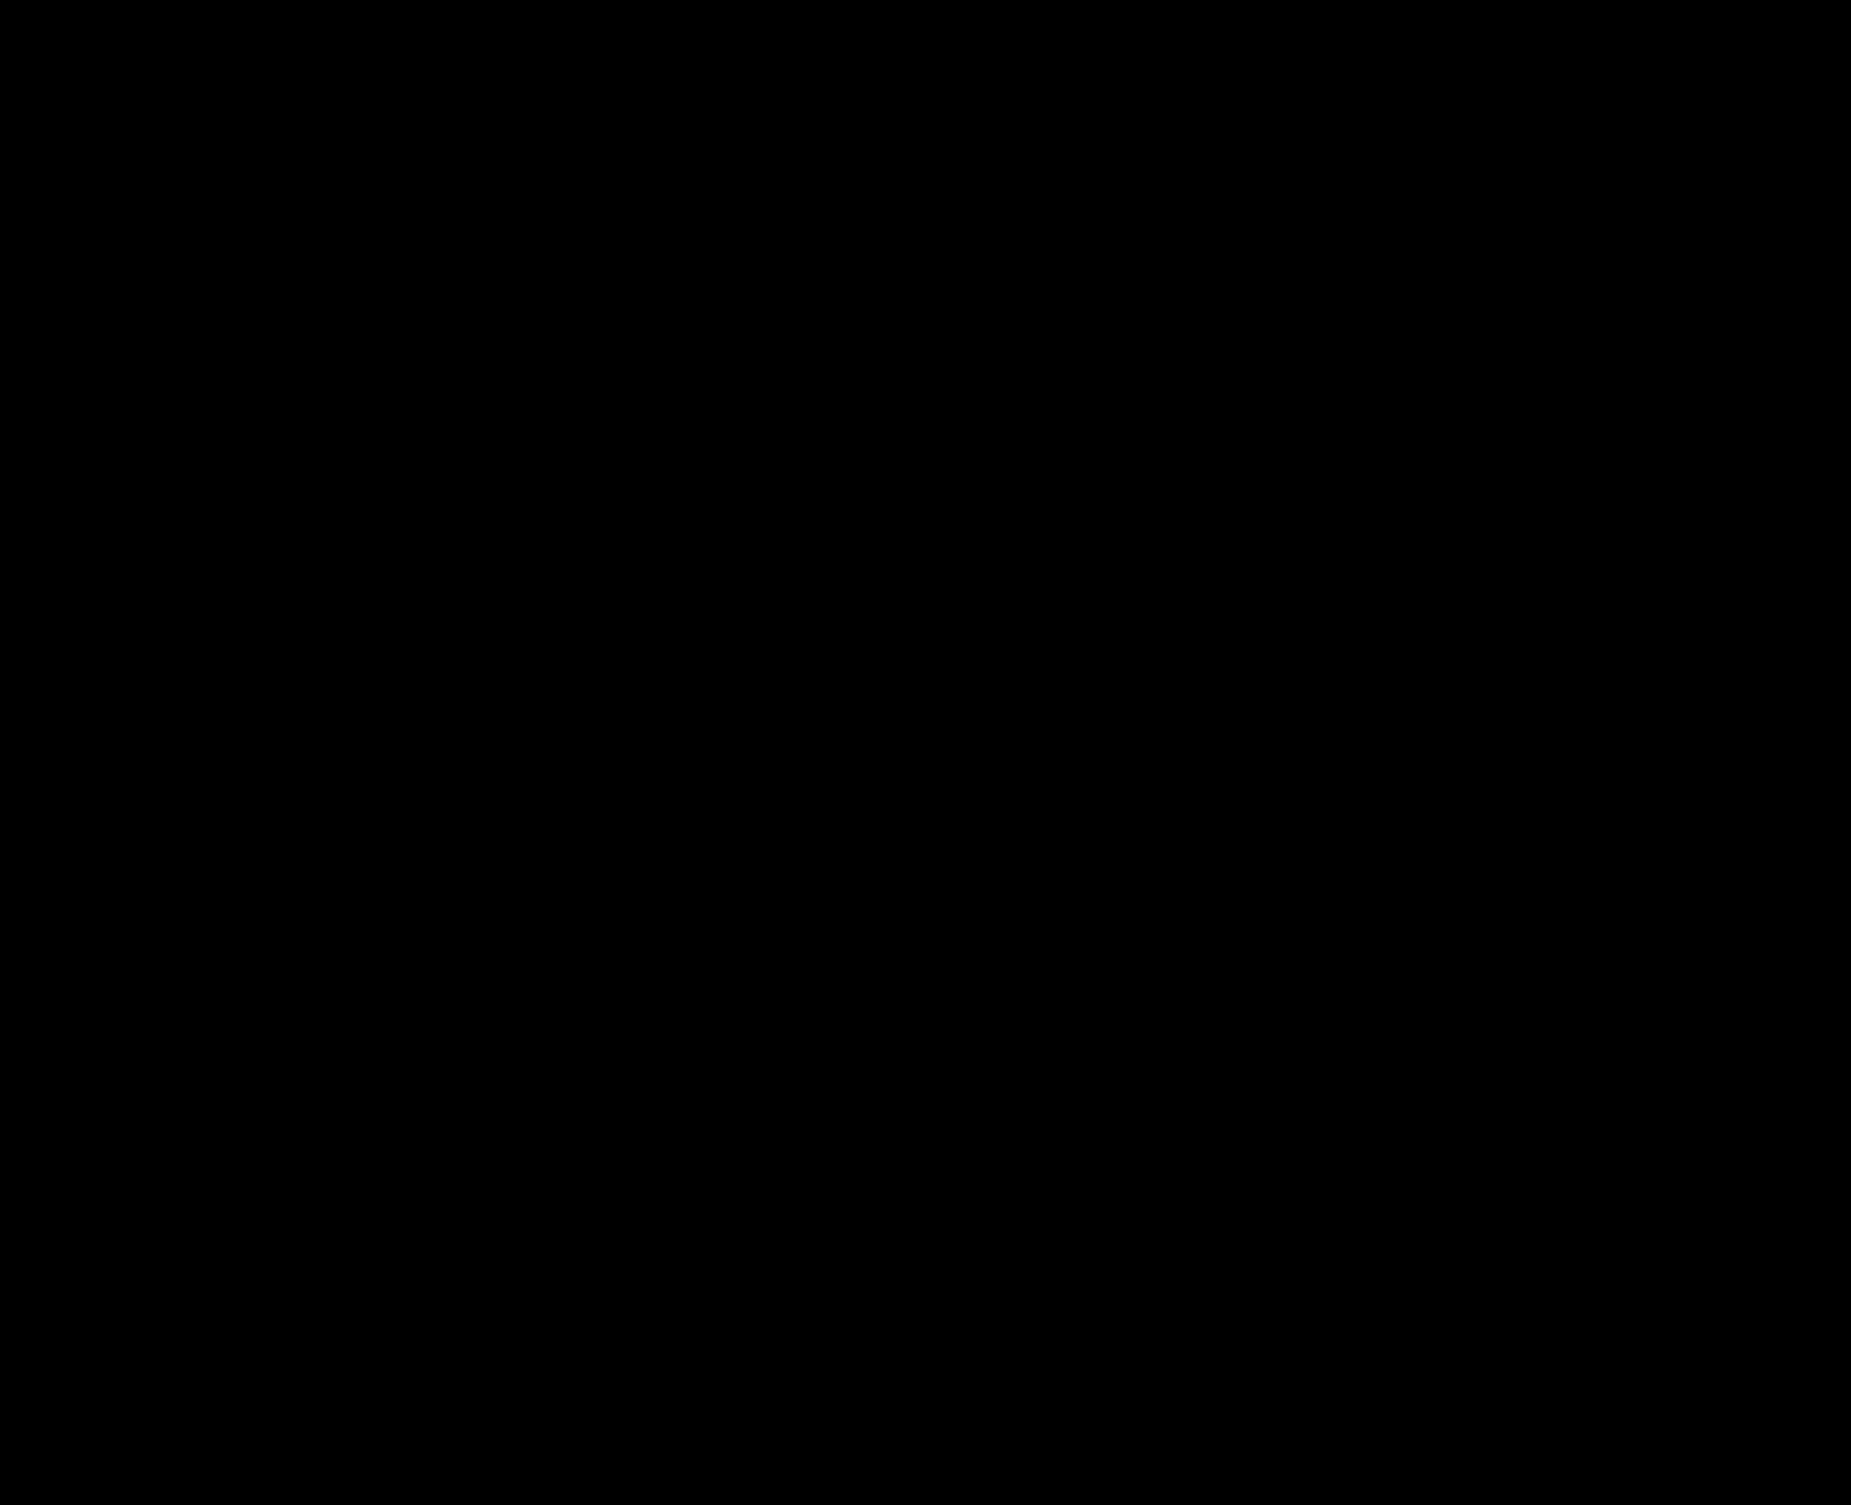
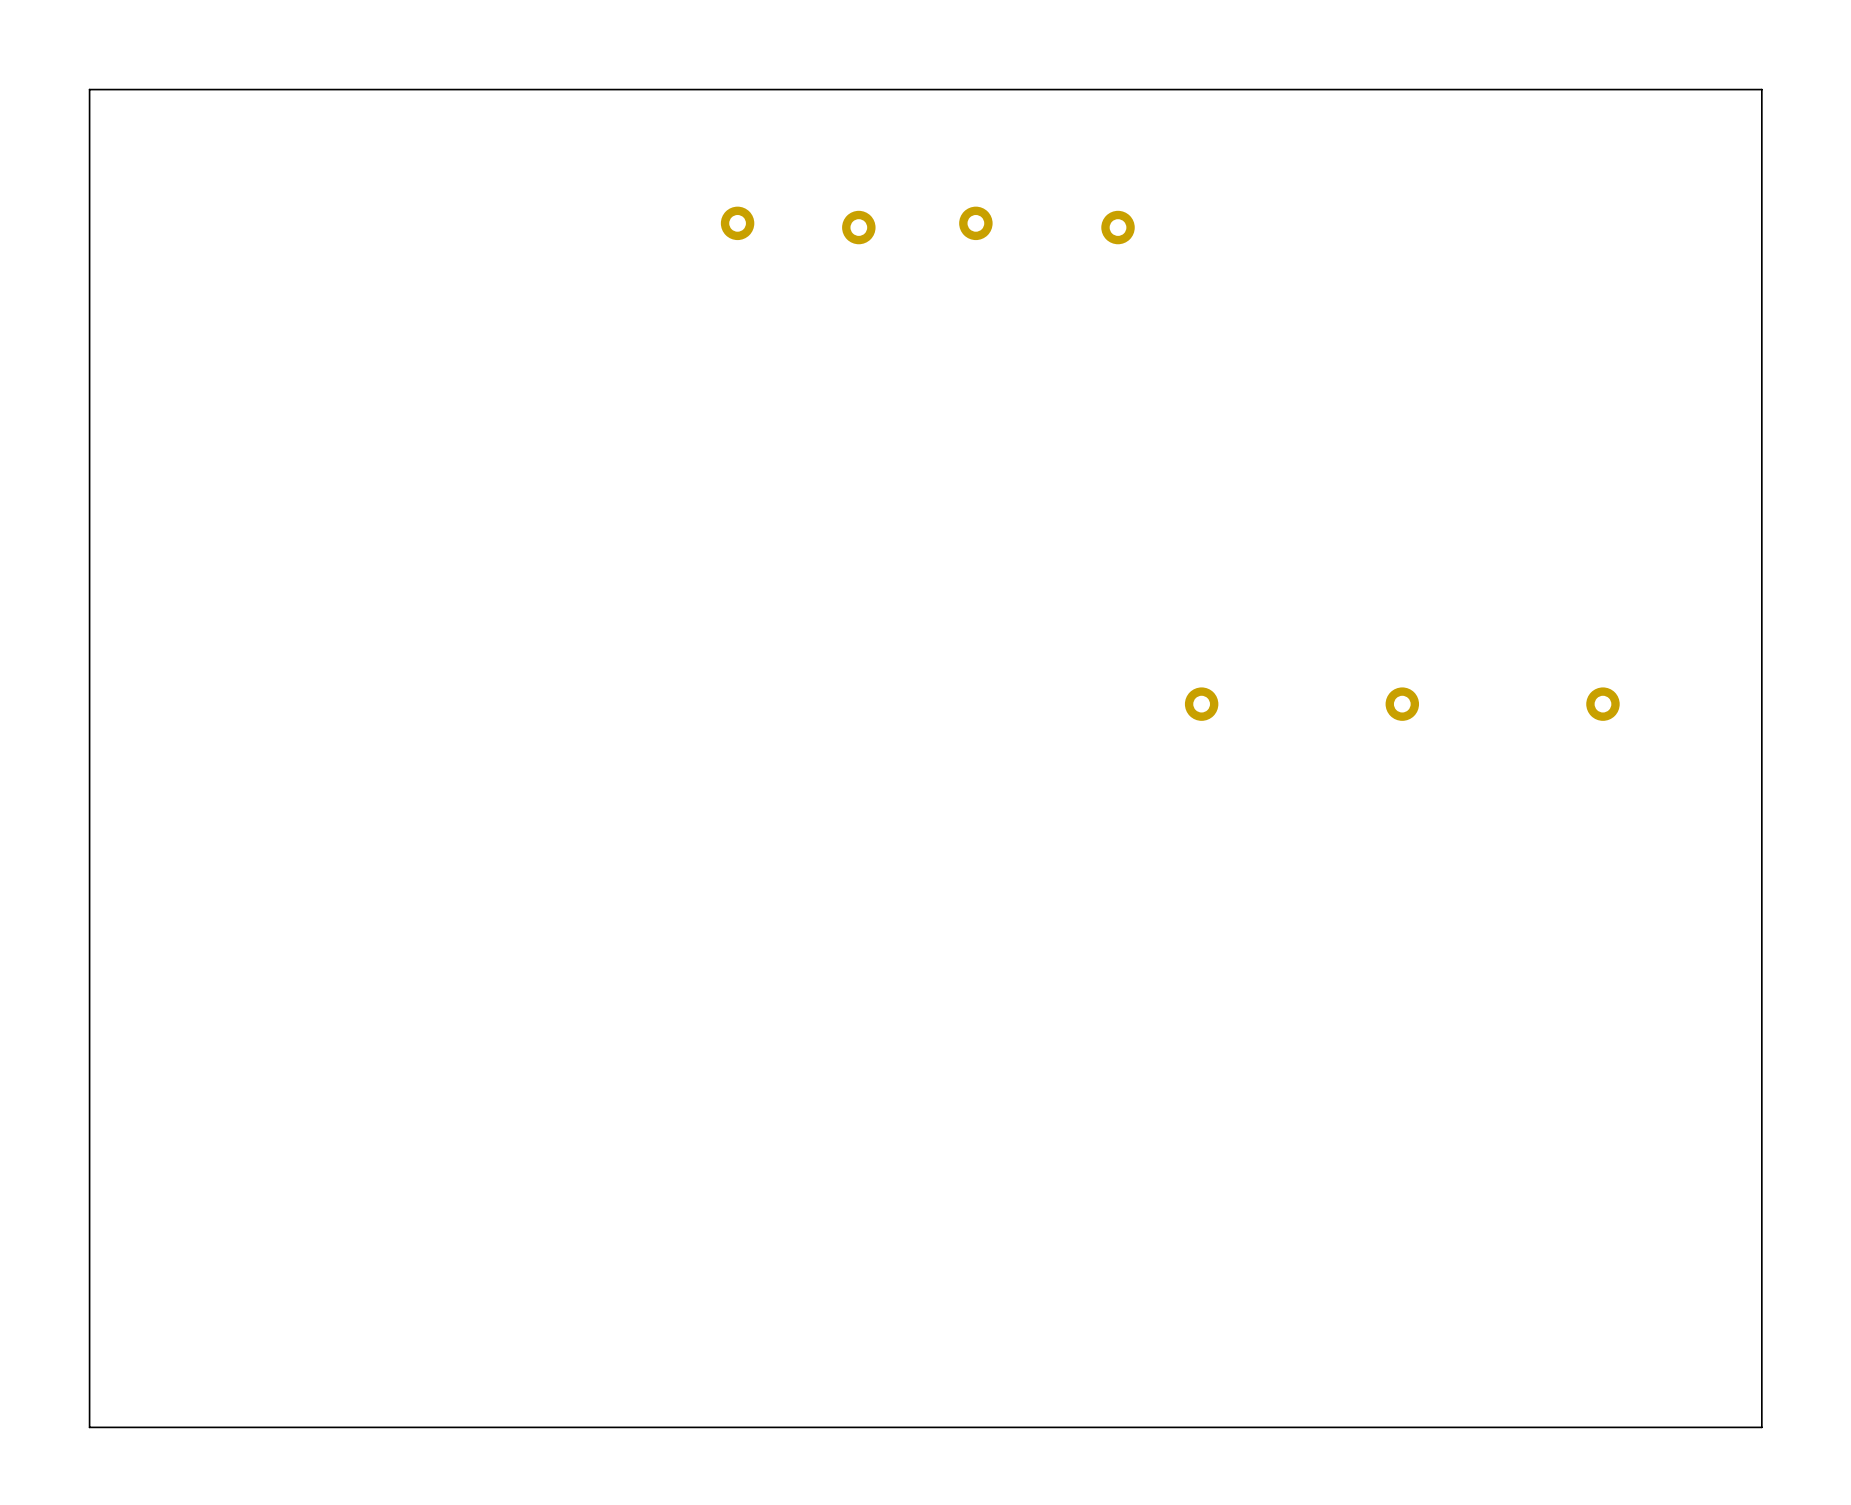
board edge: none -> (1761, 89) (89, 89) (89, 1427) (1761, 1427) (1761, 89)
part: none -> (737, 223)
part: none -> (975, 223)
part: none -> (858, 227)
part: none -> (1118, 227)
part: none -> (1201, 704)
part: none -> (1402, 704)
part: none -> (1602, 704)

